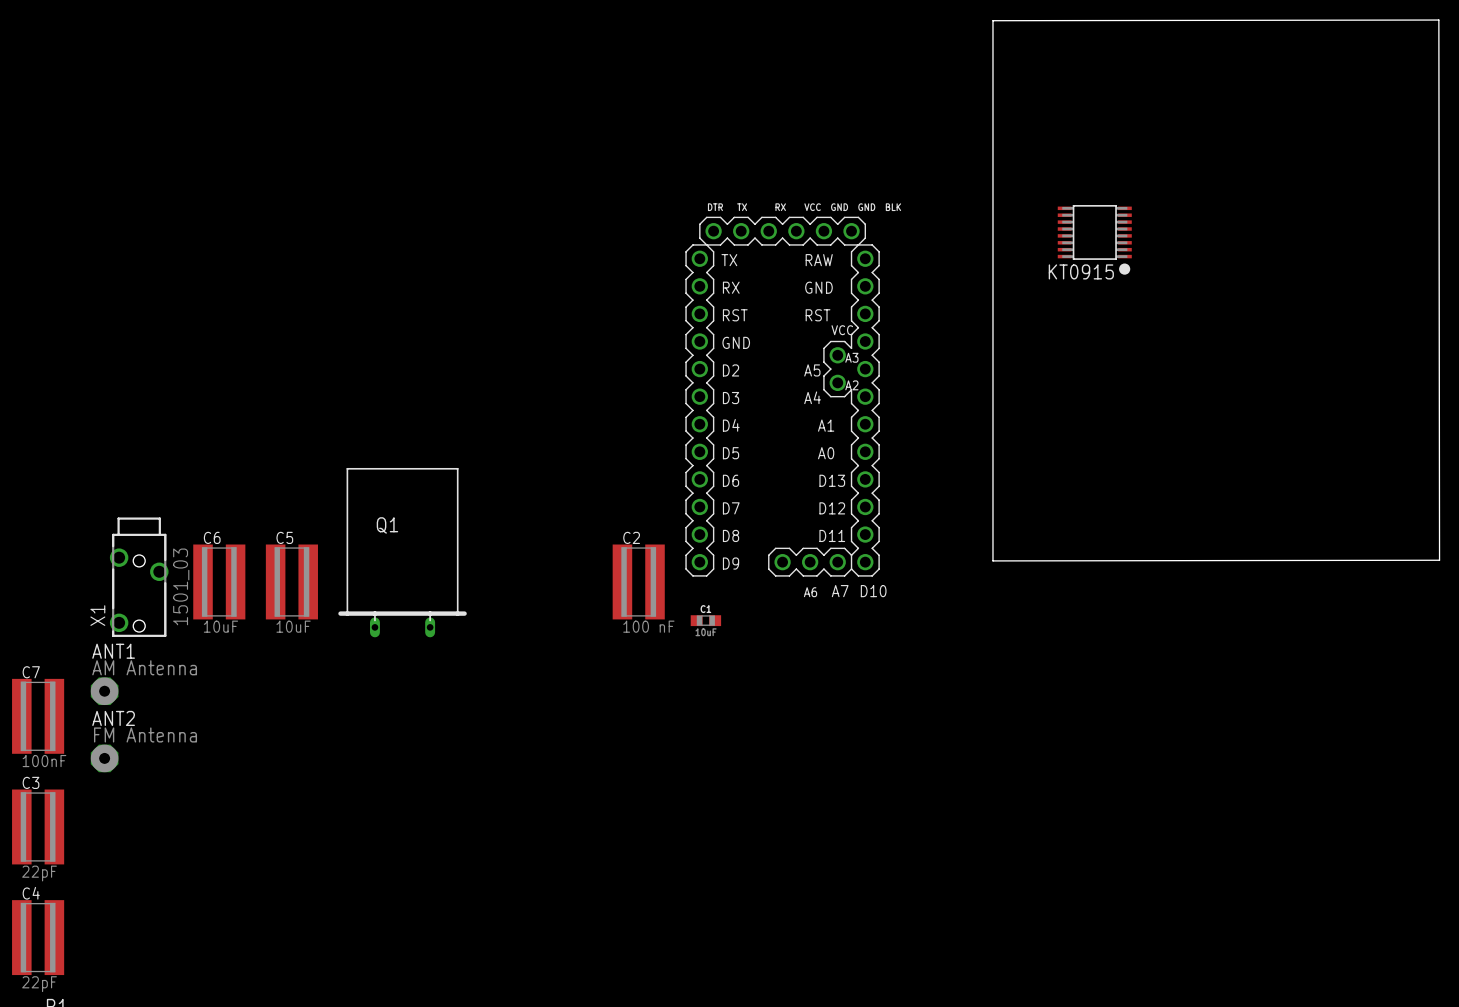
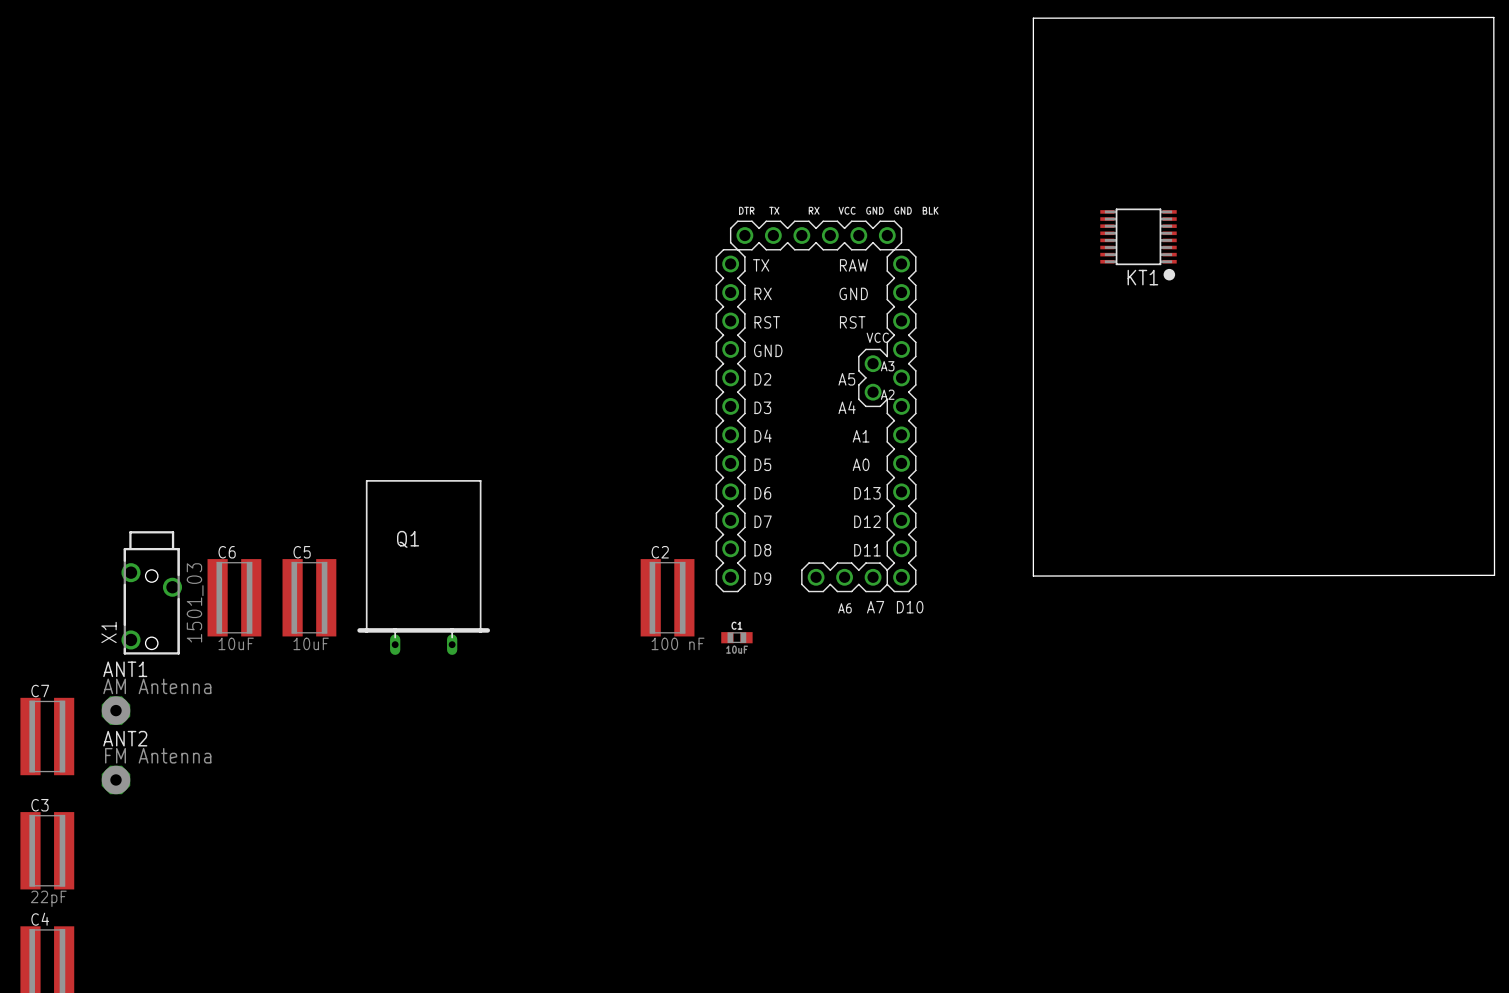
KT0915 name: KT0915 (1081, 271) -> KT1 (1142, 277)
C7 value: 100nF (44, 761) -> none

